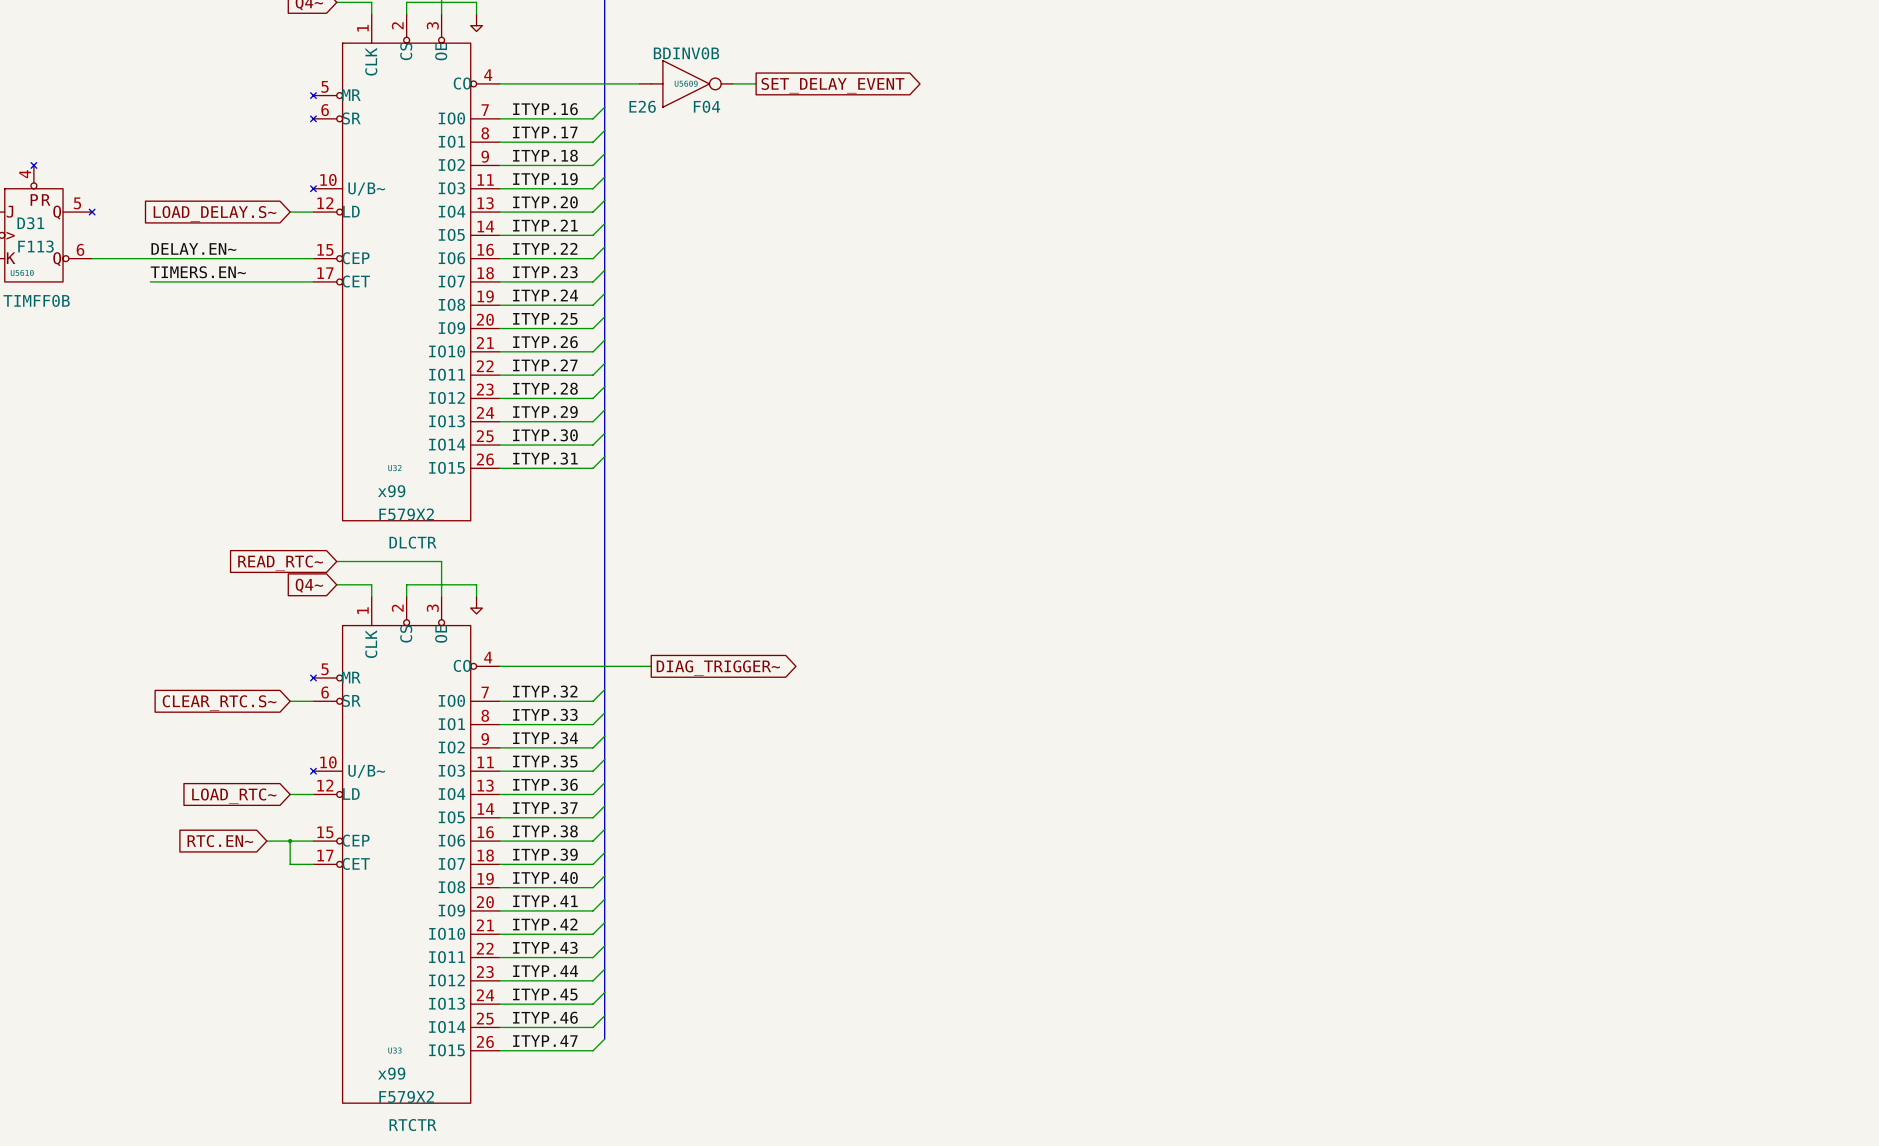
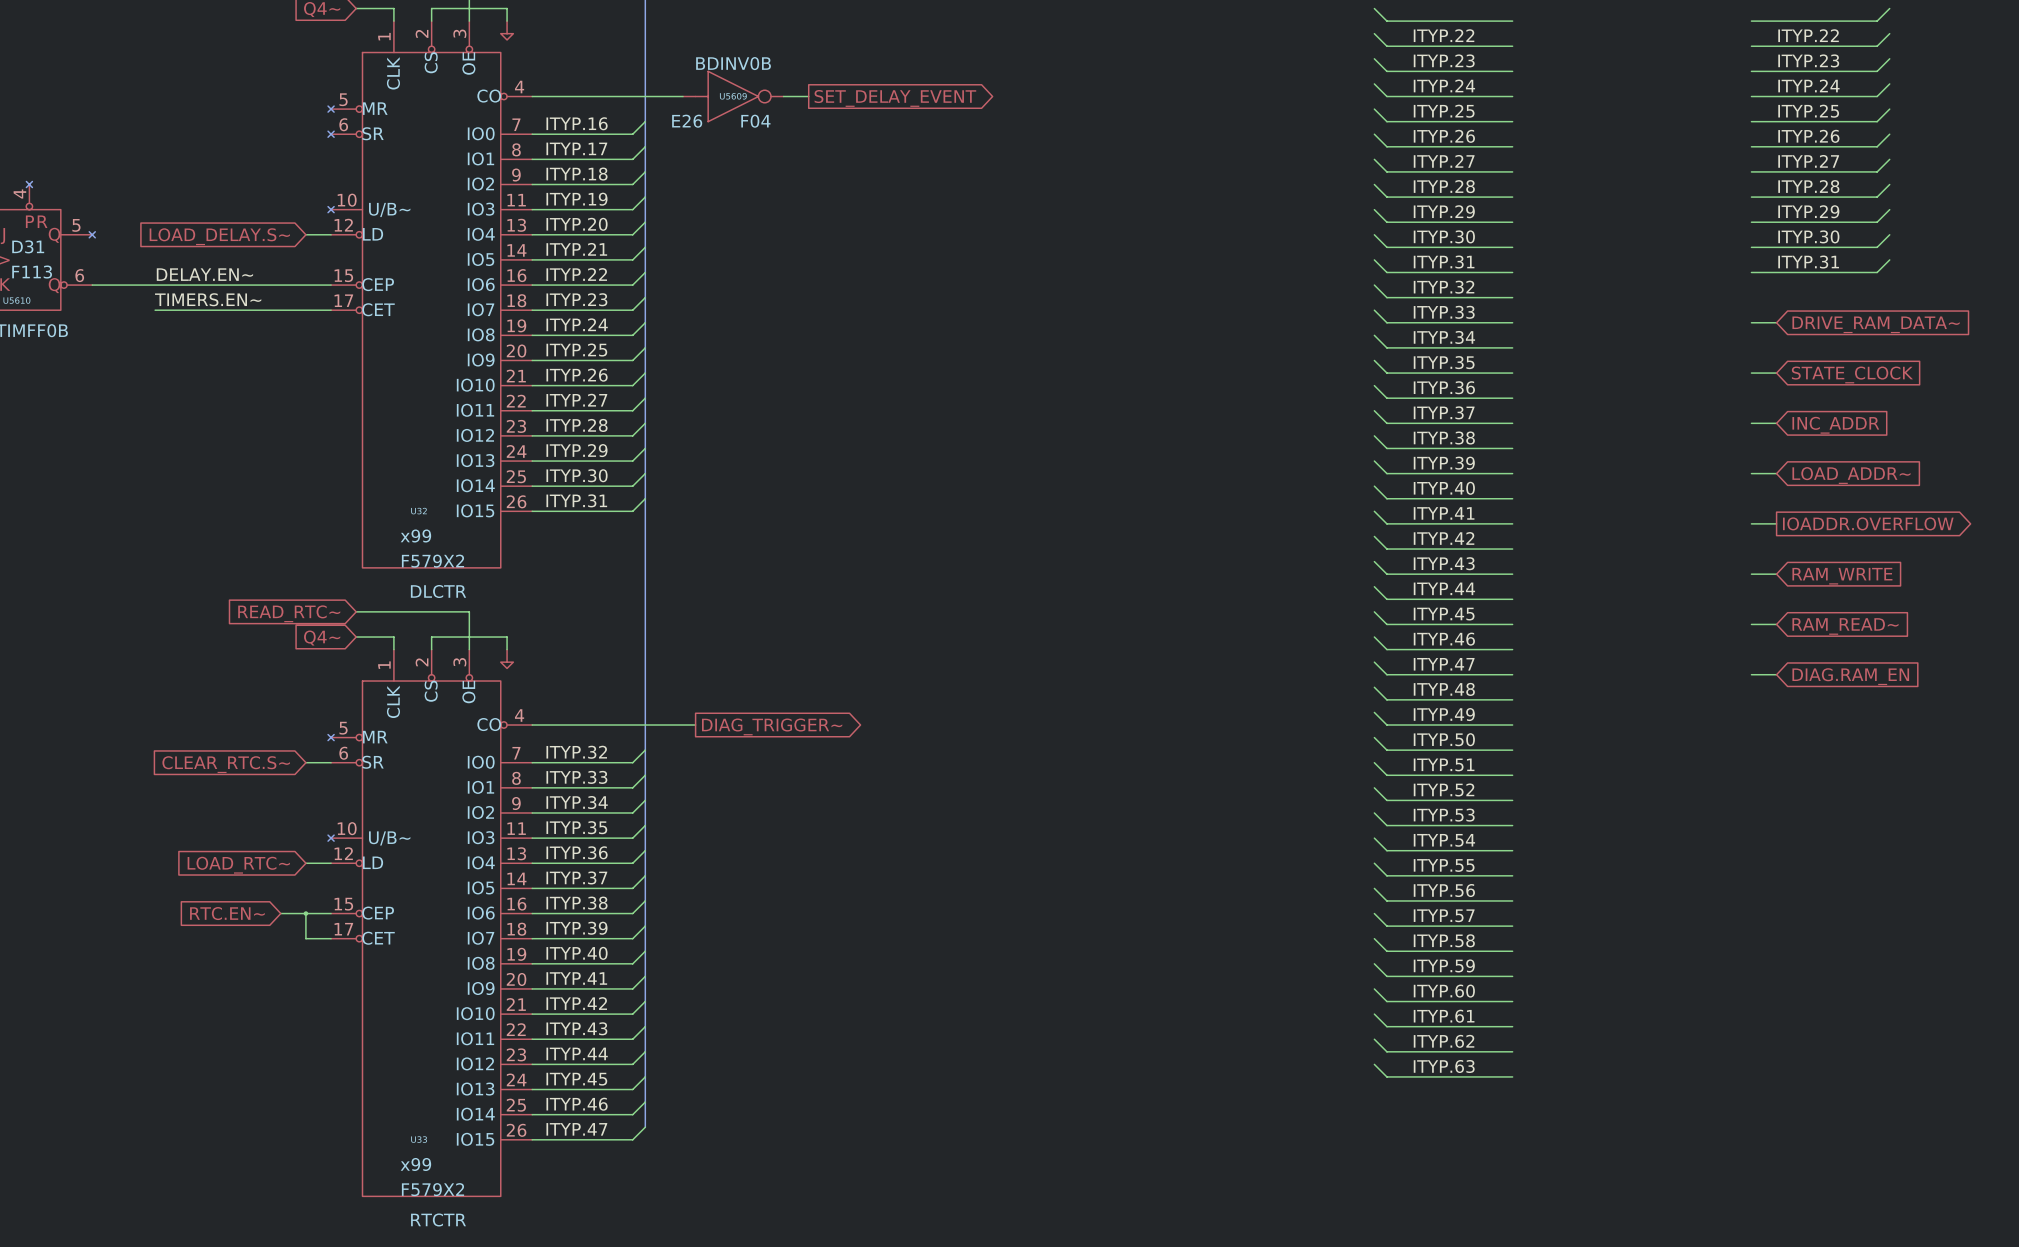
wire: none -> (1374, 8) (1386, 21) (1512, 21)
wire: none -> (1889, 8) (1877, 21) (1751, 21)
wire: none -> (1374, 33) (1386, 46) (1512, 46)
wire: none -> (1889, 33) (1877, 46) (1751, 46)
label: none -> ITYP.22 (1444, 35)
label: none -> ITYP.22 (1808, 35)
wire: none -> (1374, 58) (1386, 71) (1512, 71)
wire: none -> (1889, 58) (1877, 71) (1751, 71)
label: none -> ITYP.23 (1444, 60)
label: none -> ITYP.23 (1808, 60)
wire: none -> (1374, 83) (1386, 96) (1512, 96)
wire: none -> (1889, 83) (1877, 96) (1751, 96)
label: none -> ITYP.24 (1444, 85)
label: none -> ITYP.24 (1808, 85)
wire: none -> (1374, 109) (1386, 121) (1512, 121)
wire: none -> (1889, 109) (1877, 121) (1751, 121)
label: none -> ITYP.25 (1444, 111)
label: none -> ITYP.25 (1808, 111)
wire: none -> (1374, 134) (1386, 146) (1512, 146)
wire: none -> (1889, 134) (1877, 146) (1751, 146)
label: none -> ITYP.26 (1444, 136)
label: none -> ITYP.26 (1808, 136)
wire: none -> (1374, 159) (1386, 171) (1512, 171)
wire: none -> (1889, 159) (1877, 171) (1751, 171)
label: none -> ITYP.27 (1444, 161)
label: none -> ITYP.27 (1808, 161)
wire: none -> (1374, 184) (1386, 197) (1512, 197)
wire: none -> (1889, 184) (1877, 197) (1751, 197)
label: none -> ITYP.28 (1444, 186)
label: none -> ITYP.28 (1808, 186)
wire: none -> (1374, 209) (1386, 222) (1512, 222)
wire: none -> (1889, 209) (1877, 222) (1751, 222)
label: none -> ITYP.29 (1444, 211)
label: none -> ITYP.29 (1808, 211)
wire: none -> (1374, 234) (1386, 247) (1512, 247)
wire: none -> (1889, 234) (1877, 247) (1751, 247)
label: none -> ITYP.30 (1444, 236)
label: none -> ITYP.30 (1808, 236)
wire: none -> (1374, 259) (1386, 272) (1512, 272)
wire: none -> (1889, 259) (1877, 272) (1751, 272)
label: none -> ITYP.31 (1444, 262)
label: none -> ITYP.31 (1808, 262)
wire: none -> (1374, 285) (1386, 297) (1512, 297)
label: none -> ITYP.32 (1444, 287)
wire: none -> (1374, 310) (1386, 322) (1512, 322)
label: none -> ITYP.33 (1444, 312)
wire: none -> (1751, 322) (1776, 322)
global label: none -> DRIVE_RAM_DATA~ (1876, 324)
wire: none -> (1374, 335) (1386, 347) (1512, 347)
label: none -> ITYP.34 (1444, 337)
wire: none -> (1374, 360) (1386, 373) (1512, 373)
label: none -> ITYP.35 (1444, 362)
wire: none -> (1751, 373) (1776, 373)
global label: none -> STATE_CLOCK (1852, 374)
wire: none -> (1374, 385) (1386, 398) (1512, 398)
label: none -> ITYP.36 (1444, 387)
wire: none -> (1374, 410) (1386, 423) (1512, 423)
label: none -> ITYP.37 (1444, 412)
wire: none -> (1751, 423) (1776, 423)
global label: none -> INC_ADDR (1835, 425)
wire: none -> (1374, 435) (1386, 448) (1512, 448)
label: none -> ITYP.38 (1444, 438)
wire: none -> (1374, 461) (1386, 473) (1512, 473)
label: none -> ITYP.39 (1444, 463)
wire: none -> (1751, 473) (1776, 473)
global label: none -> LOAD_ADDR~ (1851, 475)
wire: none -> (1374, 486) (1386, 498) (1512, 498)
label: none -> ITYP.40 (1444, 488)
wire: none -> (1374, 511) (1386, 523) (1512, 523)
label: none -> ITYP.41 (1444, 513)
wire: none -> (1751, 523) (1776, 523)
global label: none -> IOADDR.OVERFLOW (1868, 523)
wire: none -> (1374, 536) (1386, 549) (1512, 549)
label: none -> ITYP.42 (1444, 538)
wire: none -> (1374, 561) (1386, 574) (1512, 574)
label: none -> ITYP.43 (1444, 563)
wire: none -> (1751, 574) (1776, 574)
global label: none -> RAM_WRITE (1842, 576)
wire: none -> (1374, 586) (1386, 599) (1512, 599)
label: none -> ITYP.44 (1444, 588)
wire: none -> (1374, 611) (1386, 624) (1512, 624)
label: none -> ITYP.45 (1444, 614)
wire: none -> (1751, 624) (1776, 624)
global label: none -> RAM_READ~ (1845, 626)
wire: none -> (1374, 637) (1386, 649) (1512, 649)
label: none -> ITYP.46 (1444, 639)
wire: none -> (1374, 662) (1386, 674) (1512, 674)
label: none -> ITYP.47 (1444, 664)
wire: none -> (1751, 674) (1776, 674)
global label: none -> DIAG.RAM_EN (1850, 676)
wire: none -> (1374, 687) (1386, 699) (1512, 699)
label: none -> ITYP.48 (1444, 689)
wire: none -> (1374, 712) (1386, 725) (1512, 725)
label: none -> ITYP.49 (1444, 714)
wire: none -> (1374, 737) (1386, 750) (1512, 750)
label: none -> ITYP.50 (1444, 739)
wire: none -> (1374, 762) (1386, 775) (1512, 775)
label: none -> ITYP.51 (1444, 764)
wire: none -> (1374, 787) (1386, 800) (1512, 800)
label: none -> ITYP.52 (1444, 789)
wire: none -> (1374, 812) (1386, 825) (1512, 825)
label: none -> ITYP.53 (1444, 815)
wire: none -> (1374, 838) (1386, 850) (1512, 850)
label: none -> ITYP.54 (1444, 840)
wire: none -> (1374, 863) (1386, 875) (1512, 875)
label: none -> ITYP.55 (1444, 865)
wire: none -> (1374, 888) (1386, 900) (1512, 900)
label: none -> ITYP.56 (1444, 890)
wire: none -> (1374, 913) (1386, 926) (1512, 926)
label: none -> ITYP.57 (1444, 915)
wire: none -> (1374, 938) (1386, 951) (1512, 951)
label: none -> ITYP.58 (1444, 940)
wire: none -> (1374, 963) (1386, 976) (1512, 976)
label: none -> ITYP.59 (1444, 965)
wire: none -> (1374, 988) (1386, 1001) (1512, 1001)
label: none -> ITYP.60 (1444, 991)
wire: none -> (1374, 1014) (1386, 1026) (1512, 1026)
label: none -> ITYP.61 (1444, 1016)
wire: none -> (1374, 1039) (1386, 1051) (1512, 1051)
label: none -> ITYP.62 (1444, 1041)
wire: none -> (1374, 1064) (1386, 1076) (1512, 1076)
label: none -> ITYP.63 (1444, 1066)

